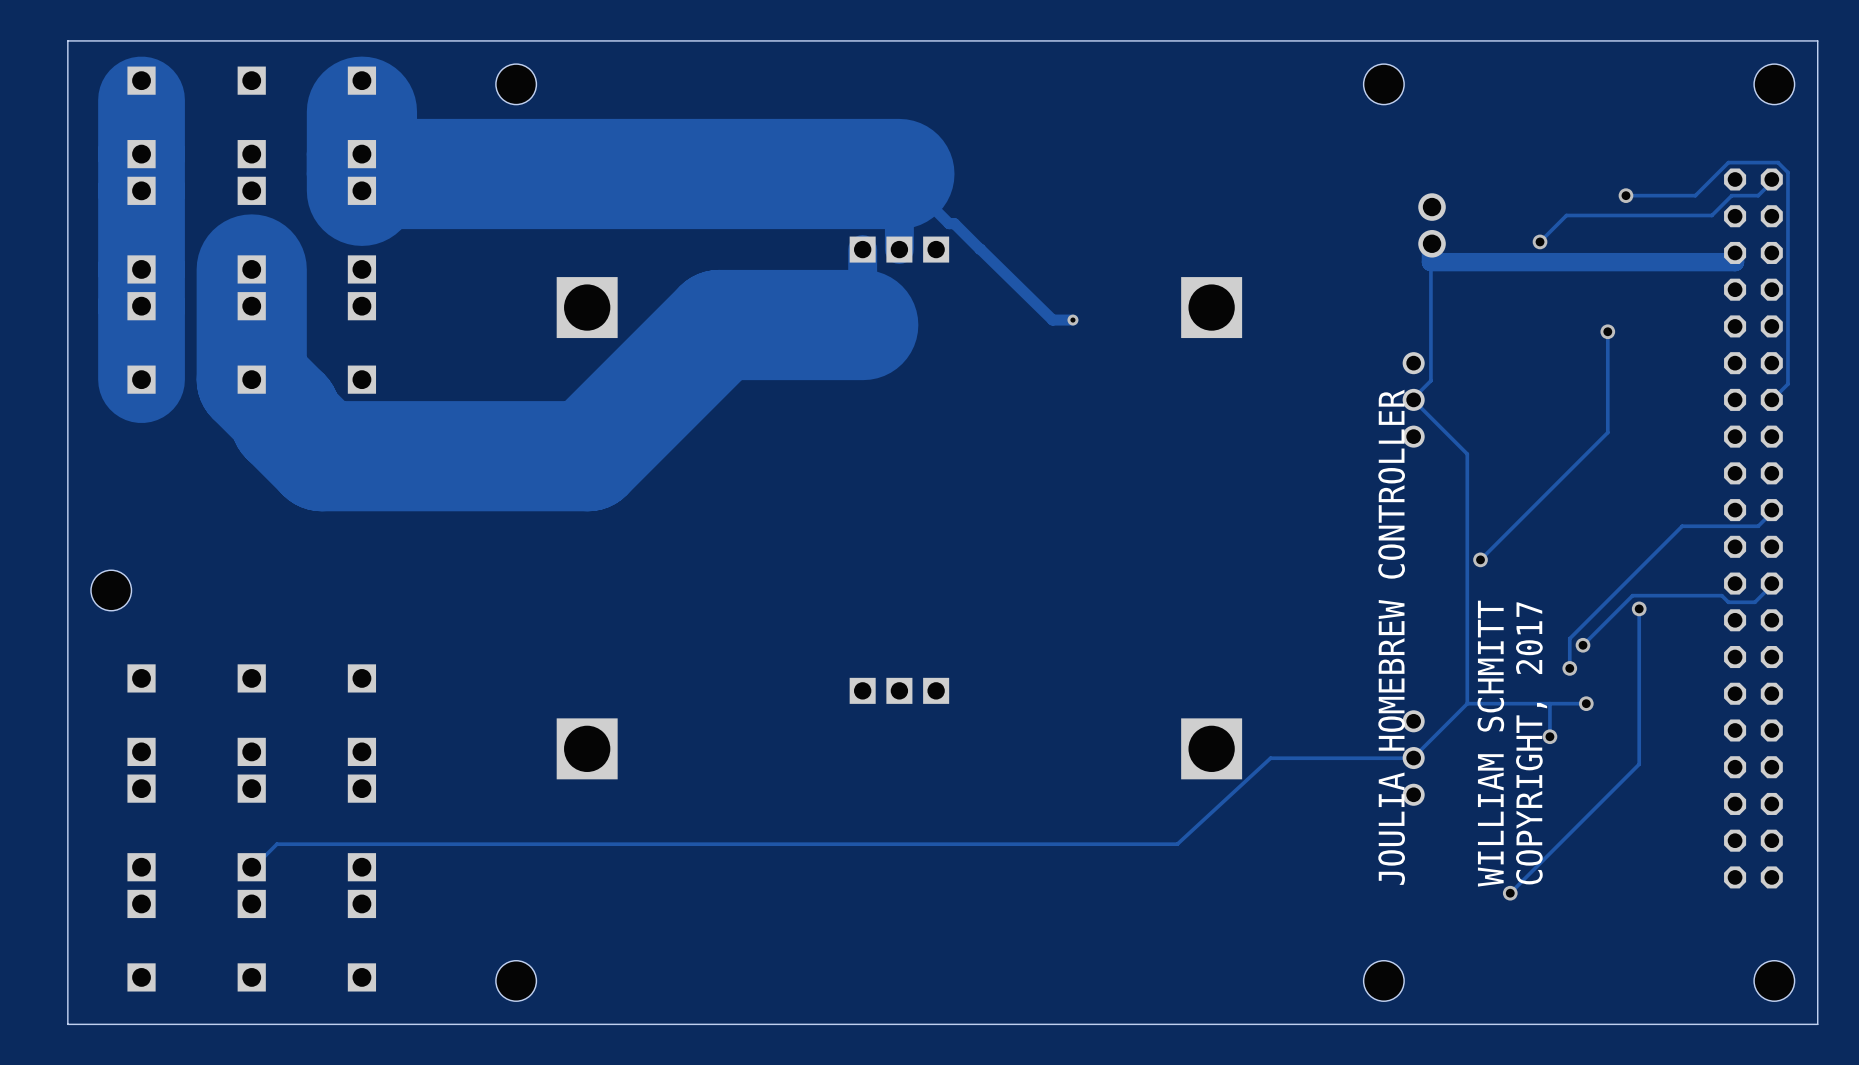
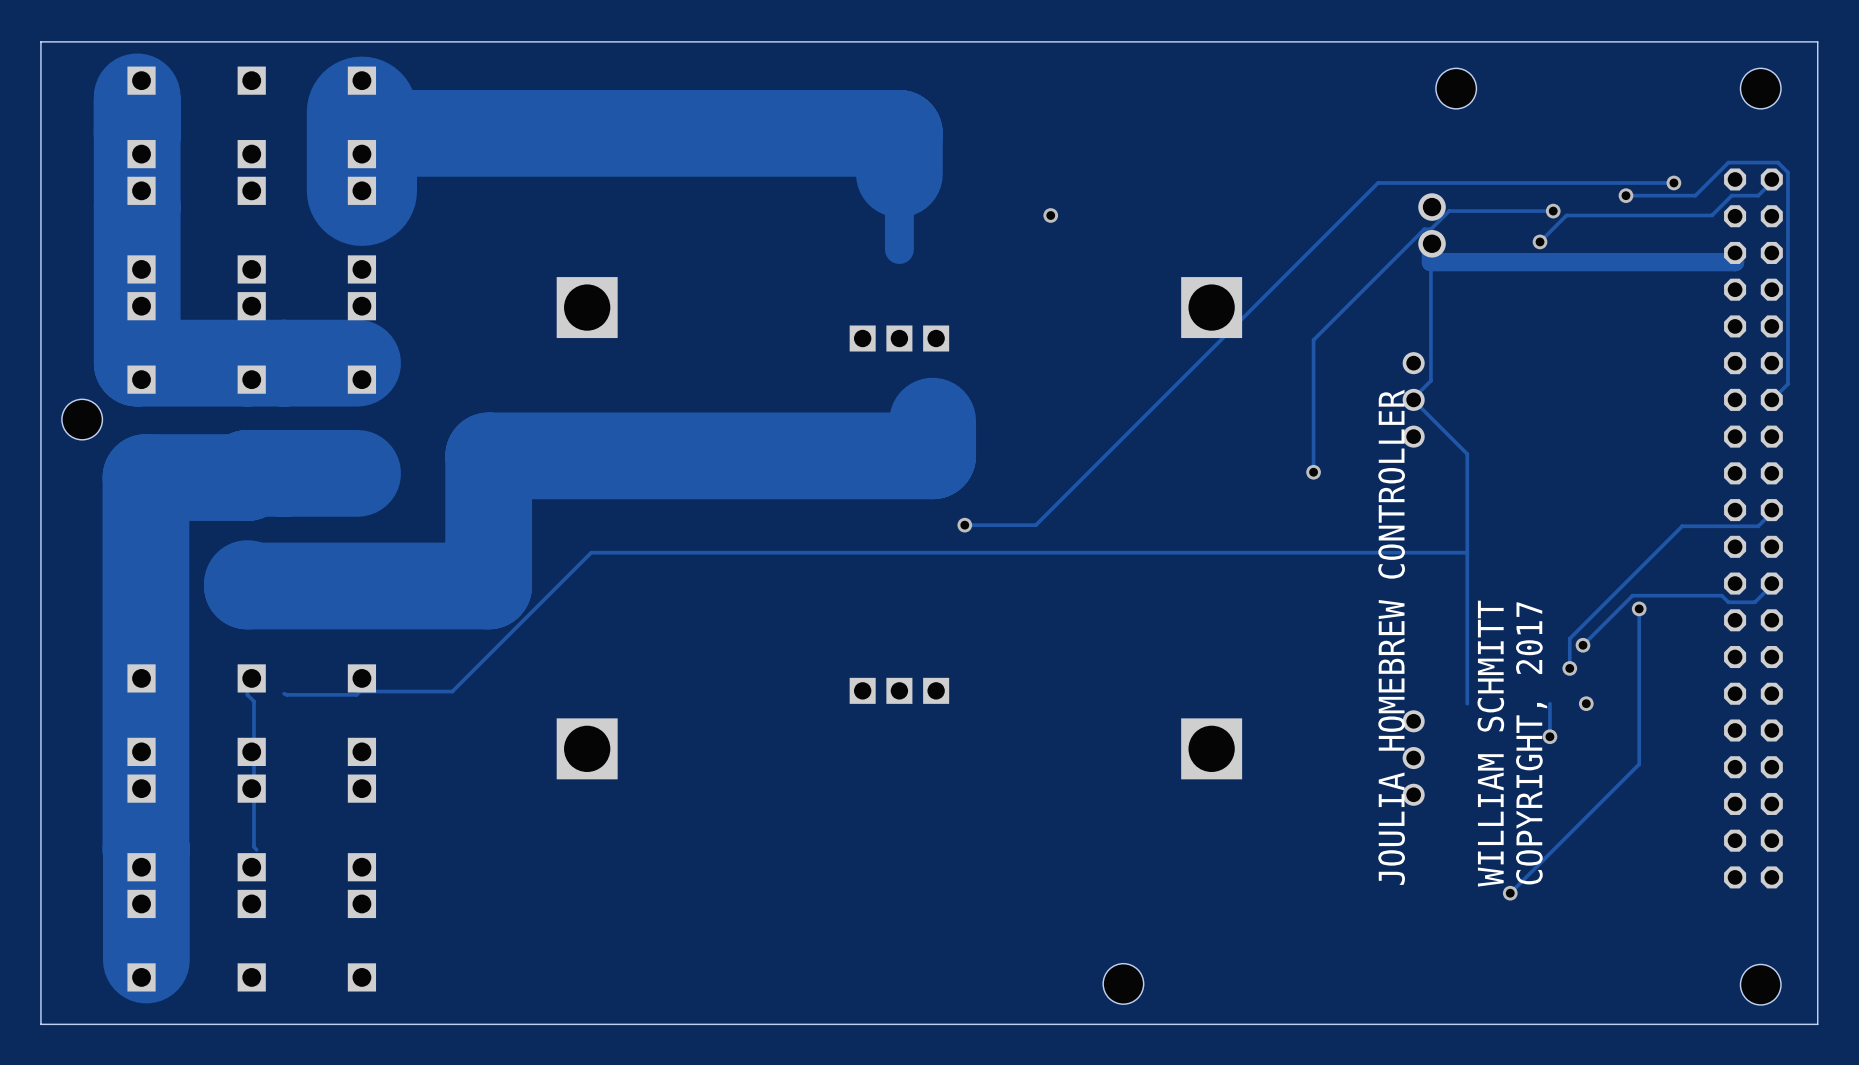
board edge: (1817, 41) (67, 40) (67, 1024) -> (1817, 41) (40, 41) (40, 1024) (67, 1024)
hole: (516, 84) -> none
hole position: (1383, 84) -> (1456, 88)
hole position: (1774, 84) -> (1760, 88)
track: none -> (137, 96) (137, 363) (357, 363)
track: (141, 99) (141, 379) -> none
track: none -> (357, 131) (899, 133) (899, 174)
track: (361, 174) (899, 174) (949, 223) (954, 223) (1052, 320) (1072, 320) -> none
track: none -> (1673, 182) (1378, 182) (1035, 525) (964, 525)
via: none -> (1673, 182)
track: none -> (1553, 211) (1449, 211) (1430, 229) (1424, 229) (1313, 340) (1313, 472)
via: none -> (1553, 211)
via: none -> (1050, 215)
track: (862, 249) (863, 325) (718, 325) (587, 456) (321, 456) (285, 419) (285, 413) (251, 379) (251, 269) -> none
part position: (899, 249) -> (899, 338)
via: (1072, 320) -> none
track: (1607, 331) (1607, 432) (1480, 559) -> none
via: (1607, 331) -> none
track: none -> (932, 421) (932, 455) (488, 455) (488, 586) (247, 586) (247, 583)
via: none -> (1313, 472)
track: none -> (357, 473) (247, 473) (247, 477)
track: none -> (247, 477) (145, 477) (146, 960)
via: none -> (964, 525)
track: none -> (1467, 552) (591, 552) (452, 691) (359, 691) (356, 694) (284, 693)
via: (1480, 559) -> none
hole position: (111, 590) -> (82, 419)
track: none -> (247, 693) (254, 701) (254, 846) (256, 849)
track: (1586, 703) (1467, 703) (1412, 758) (1270, 758) (1177, 844) (276, 844) (252, 868) (251, 867) -> none
hole: (516, 980) -> none
hole: (1383, 980) -> none
hole position: (1774, 980) -> (1760, 984)
hole: none -> (1123, 983)

